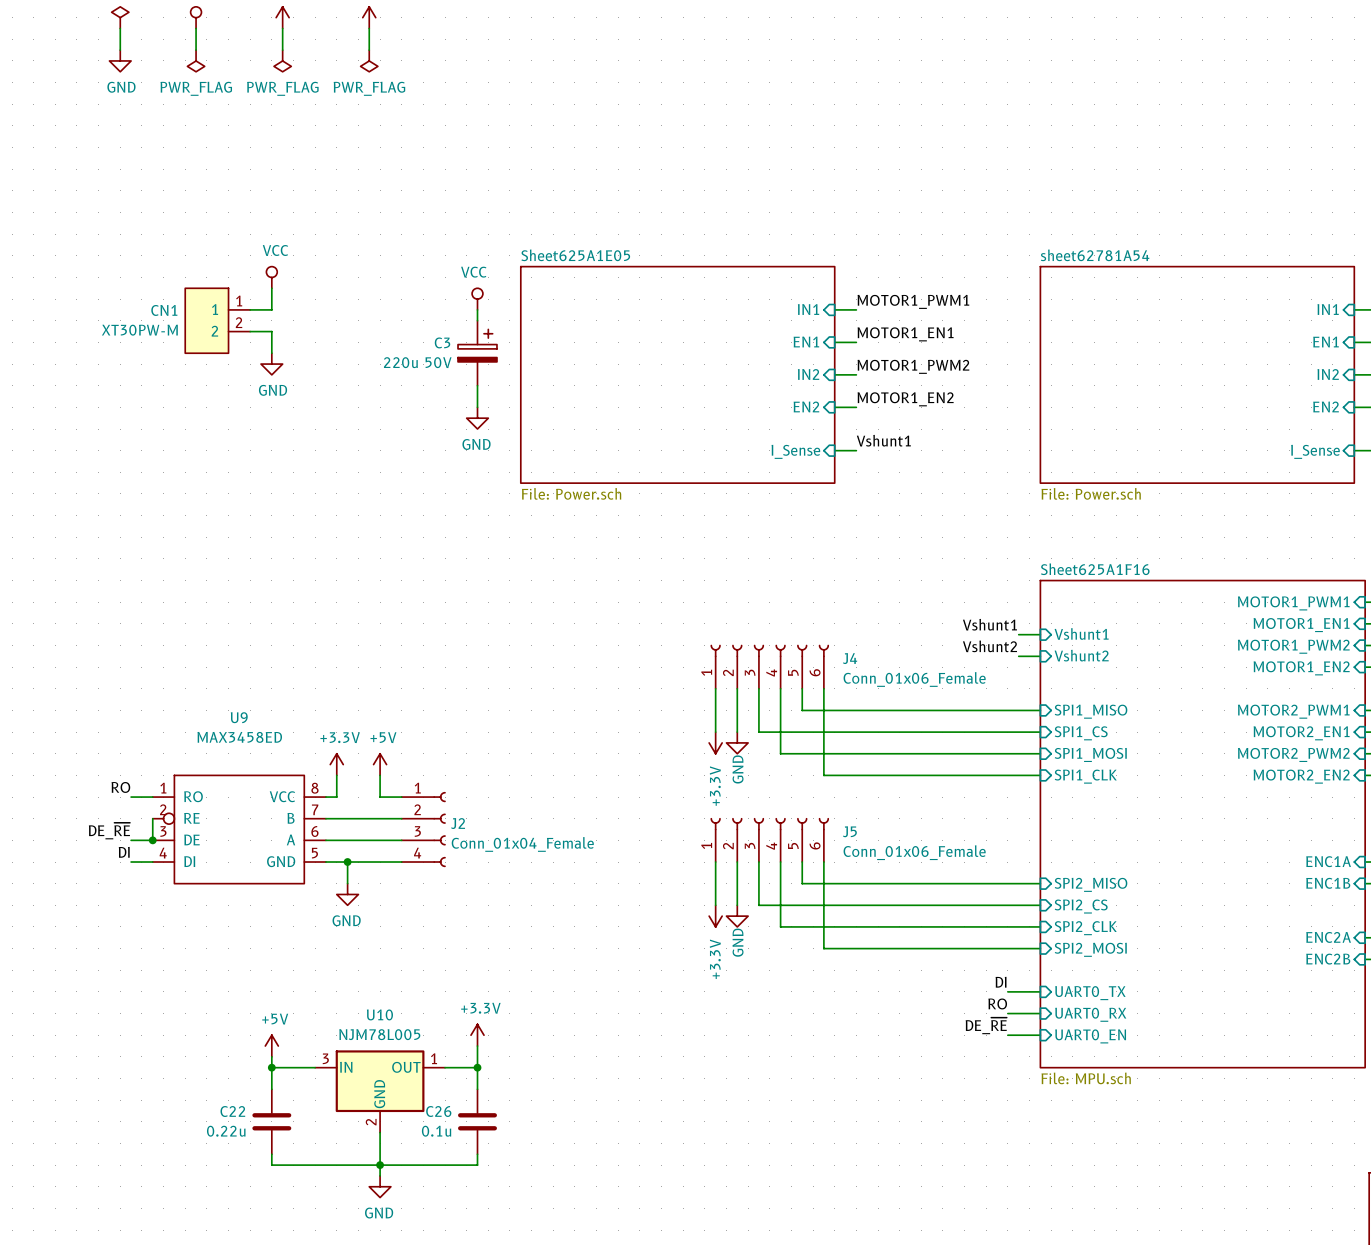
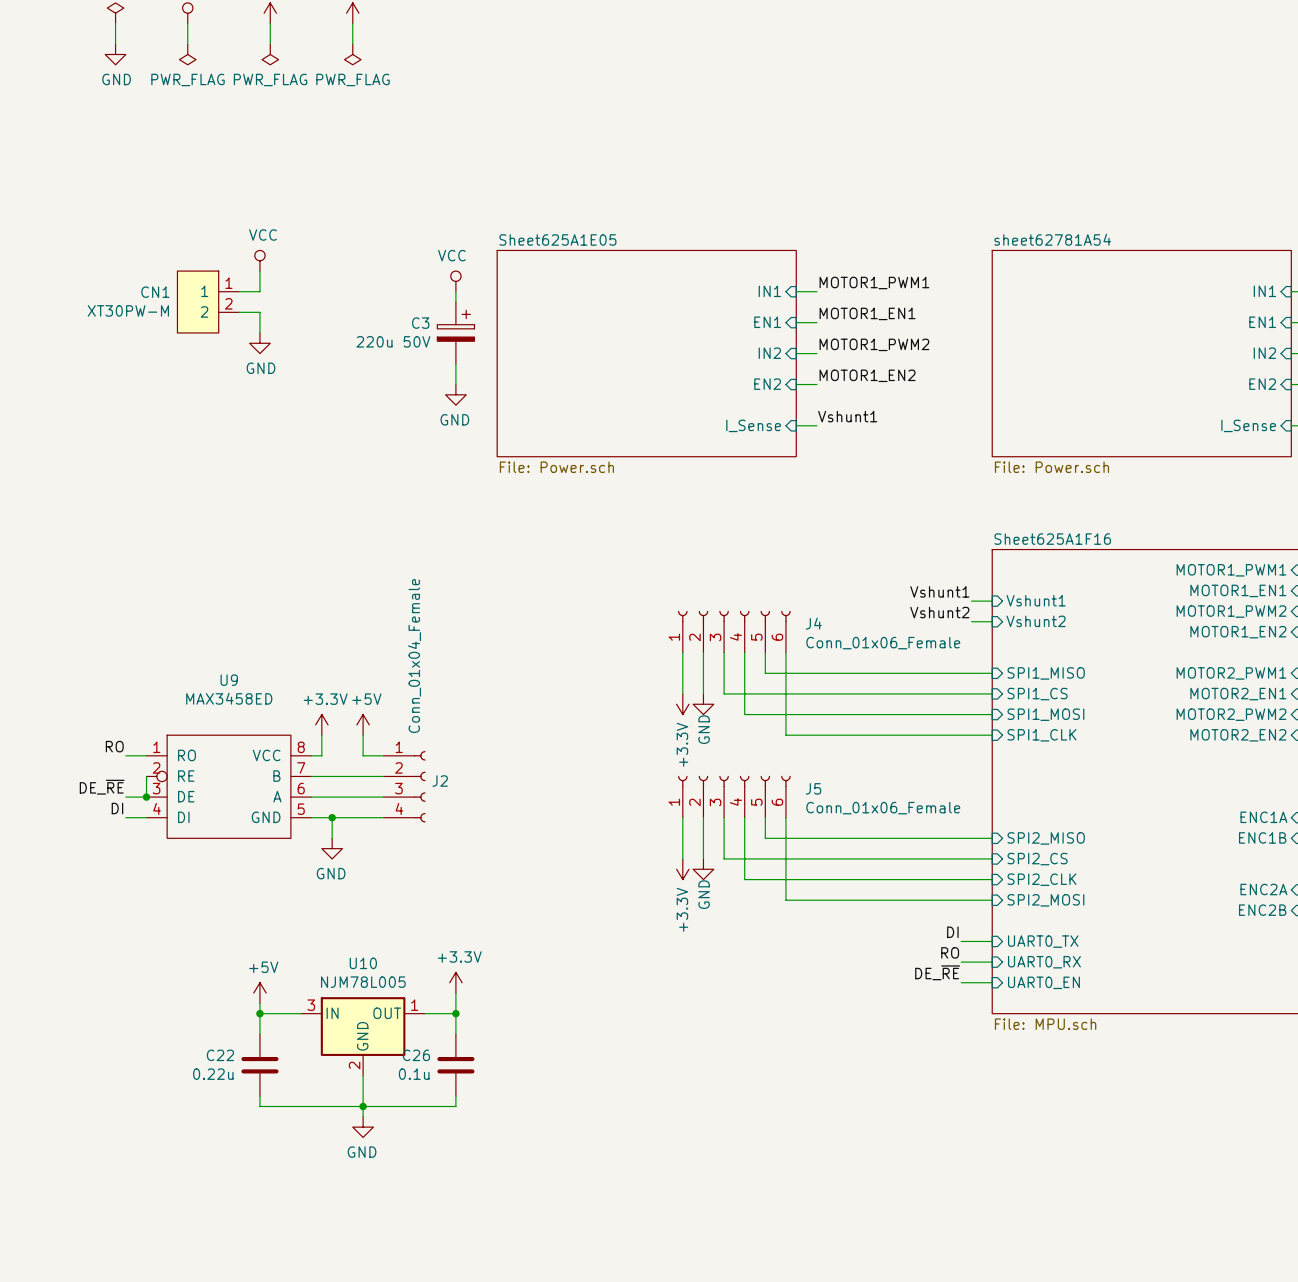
J2 value rotation: 0° (522, 844) -> 90° counterclockwise (414, 656)
J2 value position: Conn_01x04_Female (522, 844) -> Conn_01x04_Female (414, 656)

